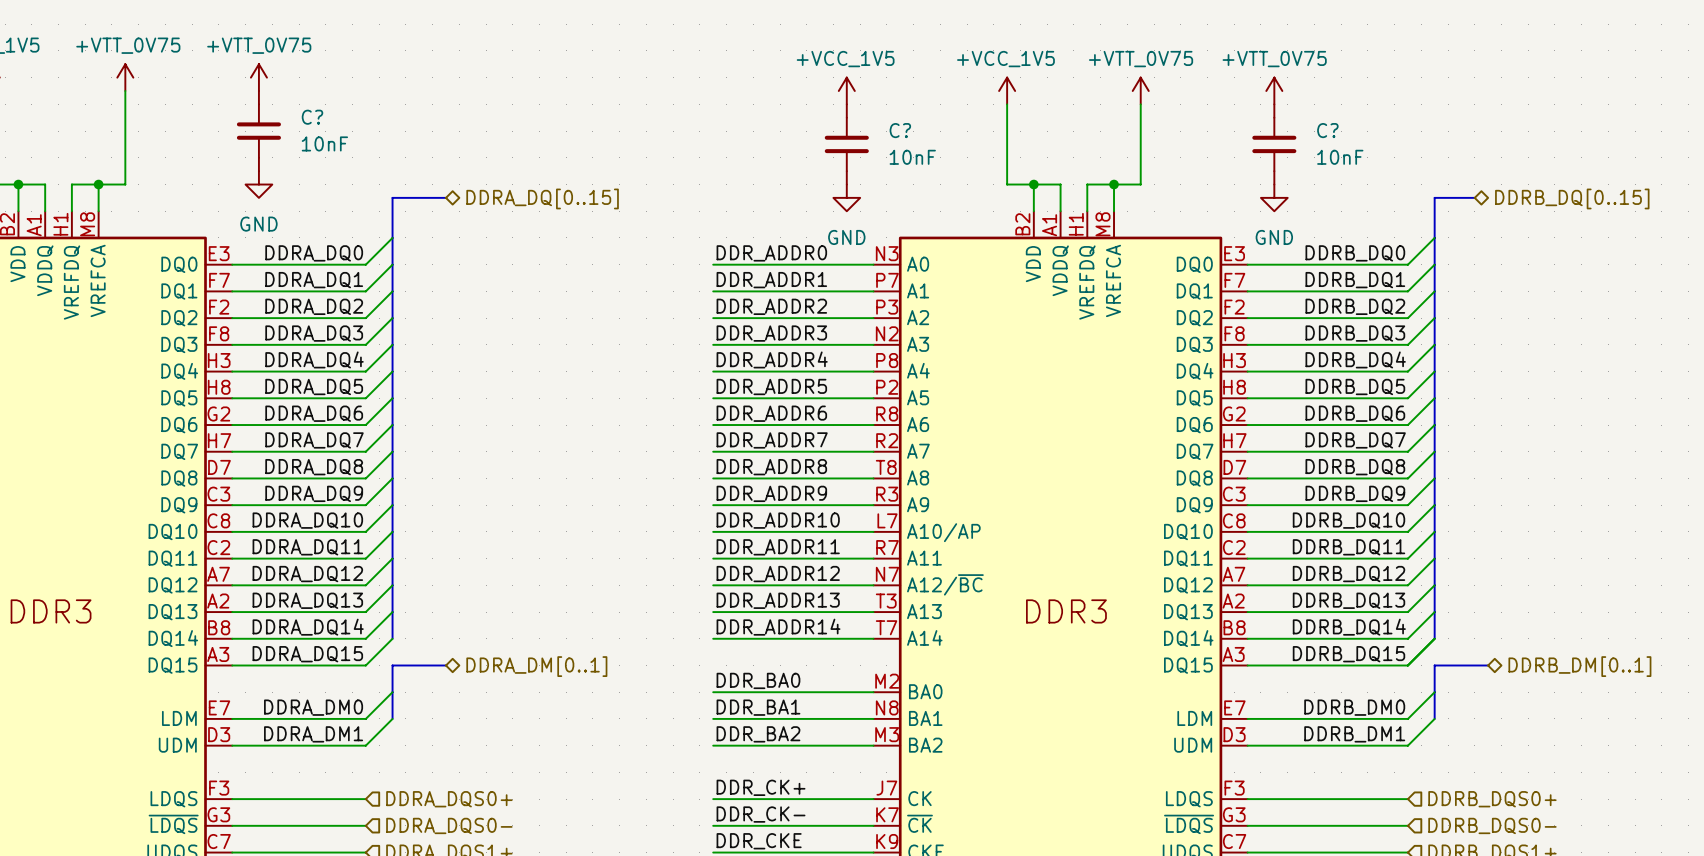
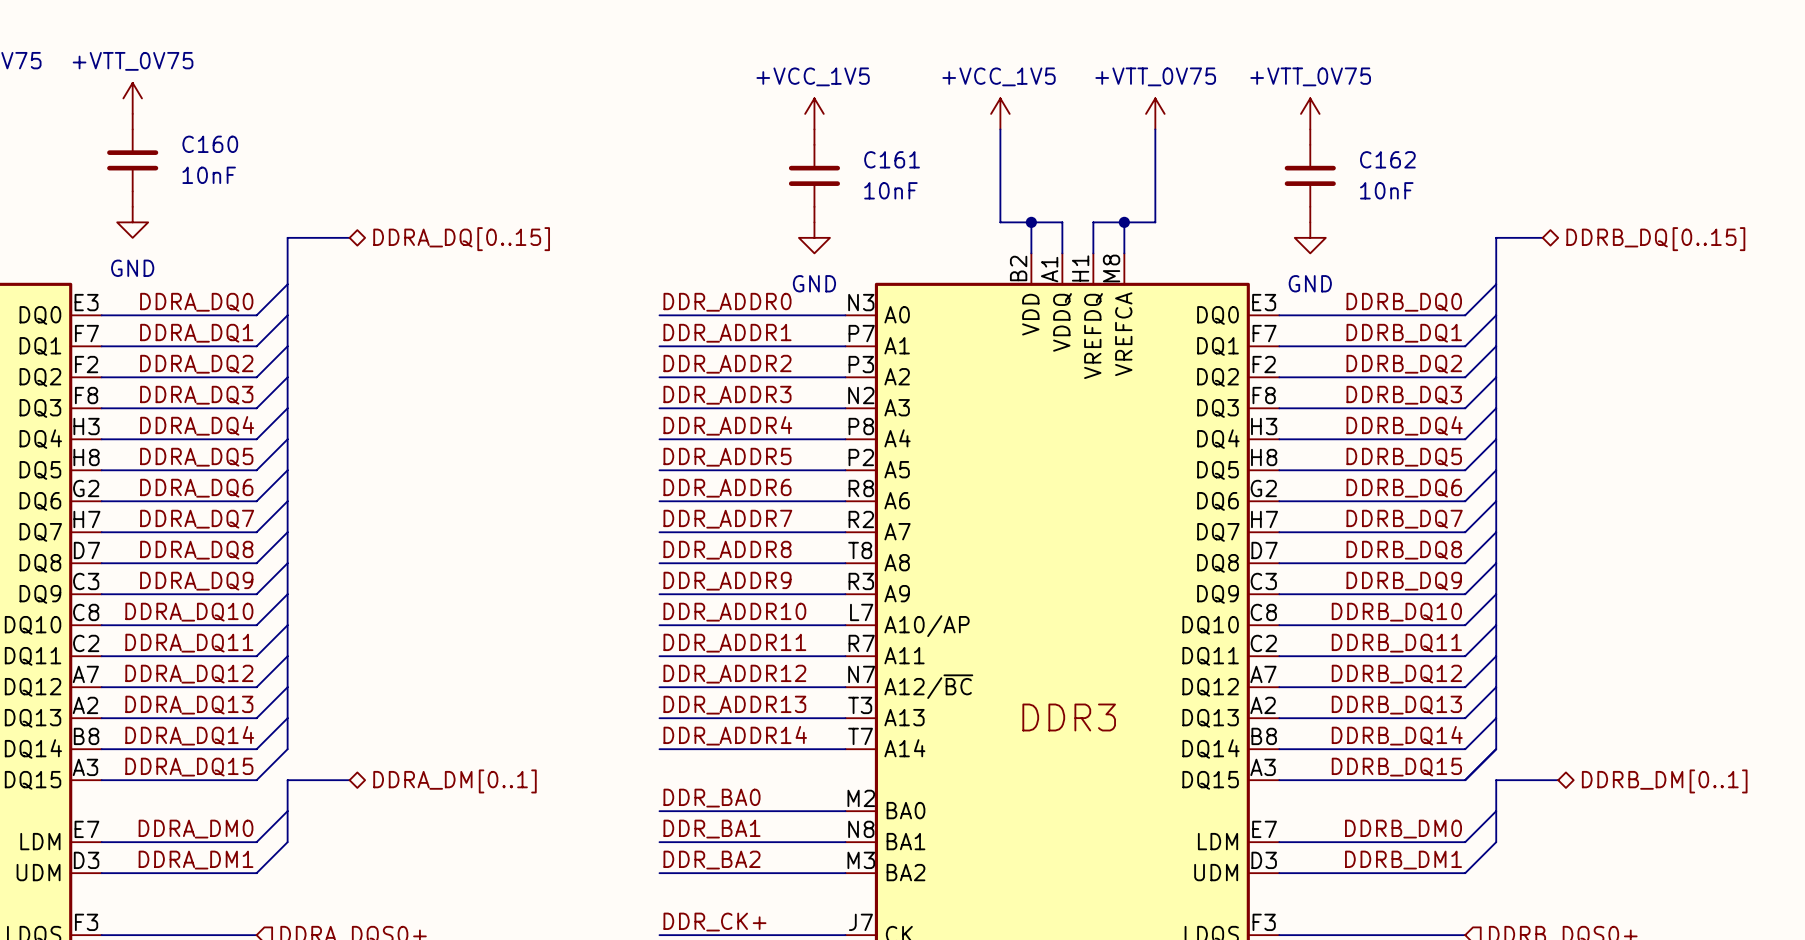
C? name: C? (312, 117) -> C160 (210, 144)
C? name: C? (900, 130) -> C161 (892, 159)
C? name: C? (1327, 130) -> C162 (1387, 159)

